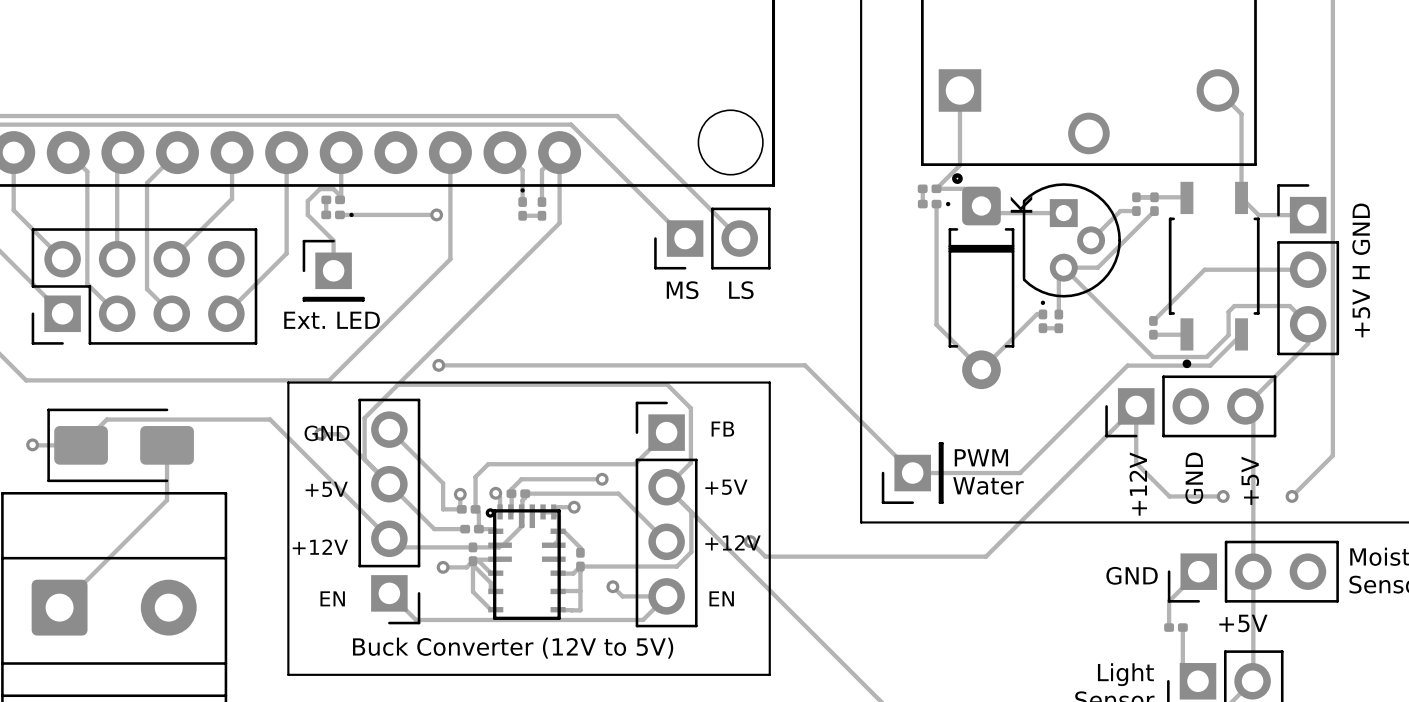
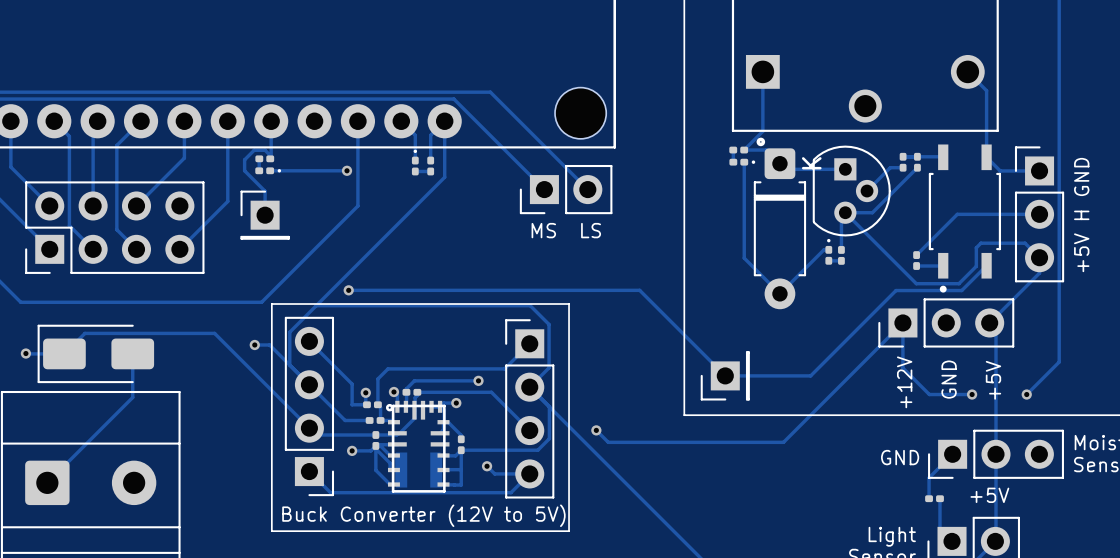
text: Ext. LED (332, 320) -> none
line: (342, 382) (288, 382) (288, 674) (769, 674) (769, 382) (716, 382) -> (271, 304) (271, 531) (569, 531) (569, 304)
text: FB (722, 429) -> none
text: GND (327, 433) -> none
text: PWM (981, 457) -> none
text: Water (988, 485) -> none
text: +5V (726, 487) -> none
text: +5V (326, 489) -> none
part footprint: [485, 504, 566, 620] -> [385, 400, 450, 493]
text: +12V (732, 542) -> none
text: +12V (320, 547) -> none
text: EN (332, 598) -> none
text: EN (721, 598) -> none

